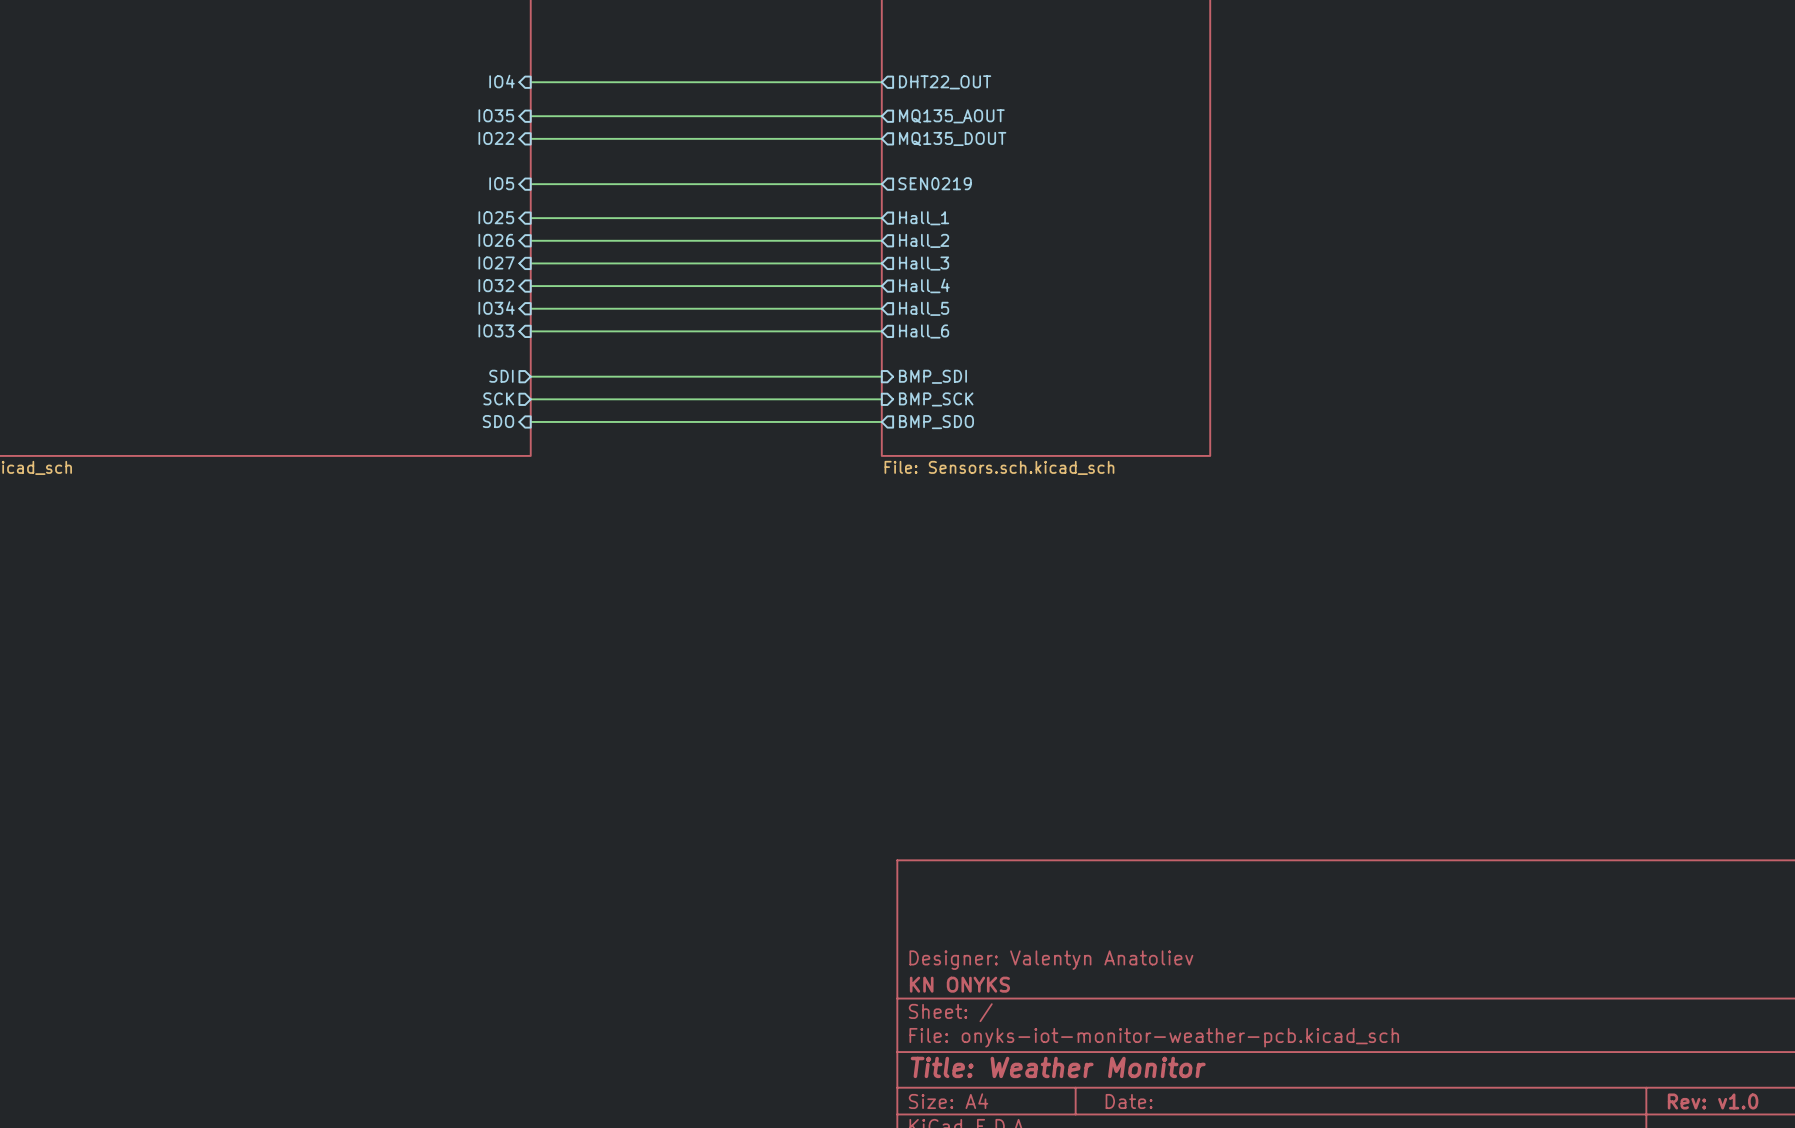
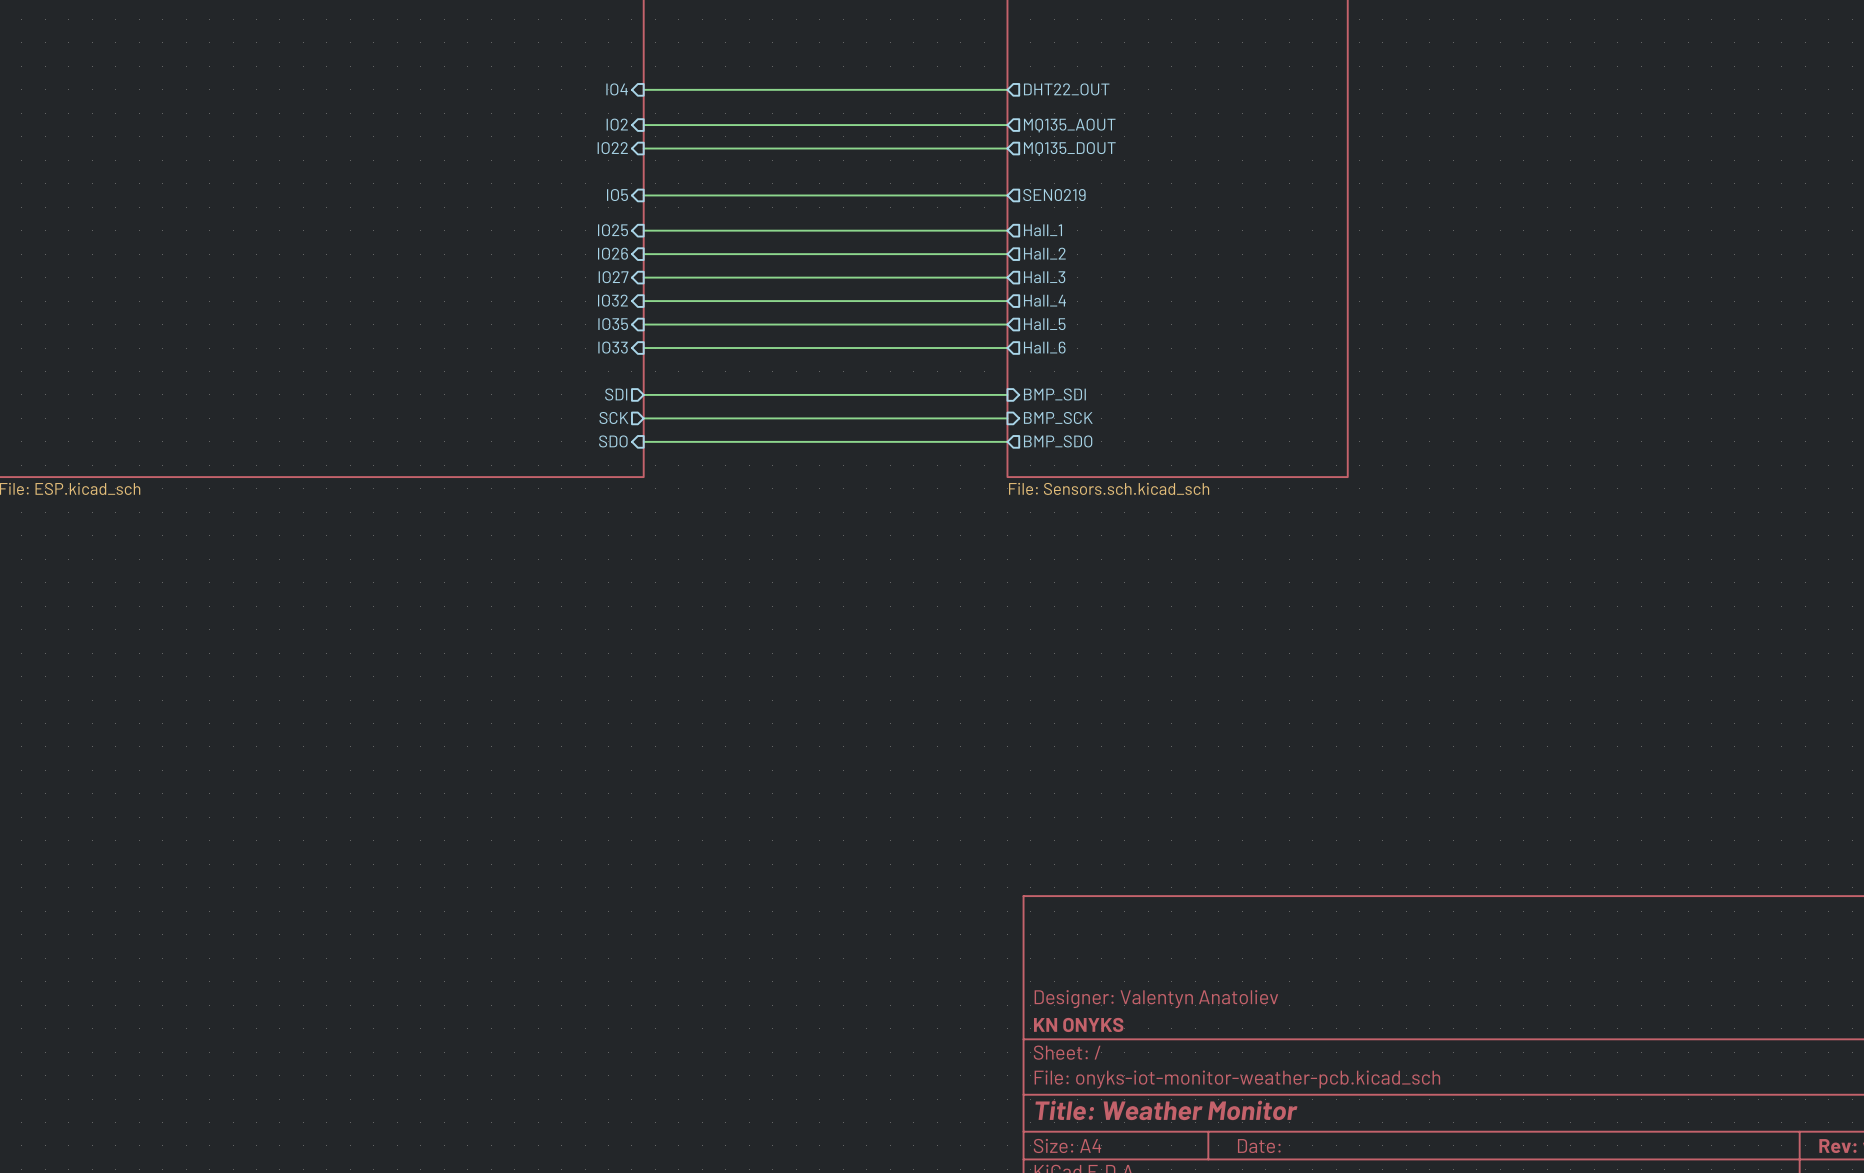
sheet pin: IO35 (496, 115) -> IO2 (617, 124)
sheet pin: IO34 (496, 308) -> IO35 (613, 324)

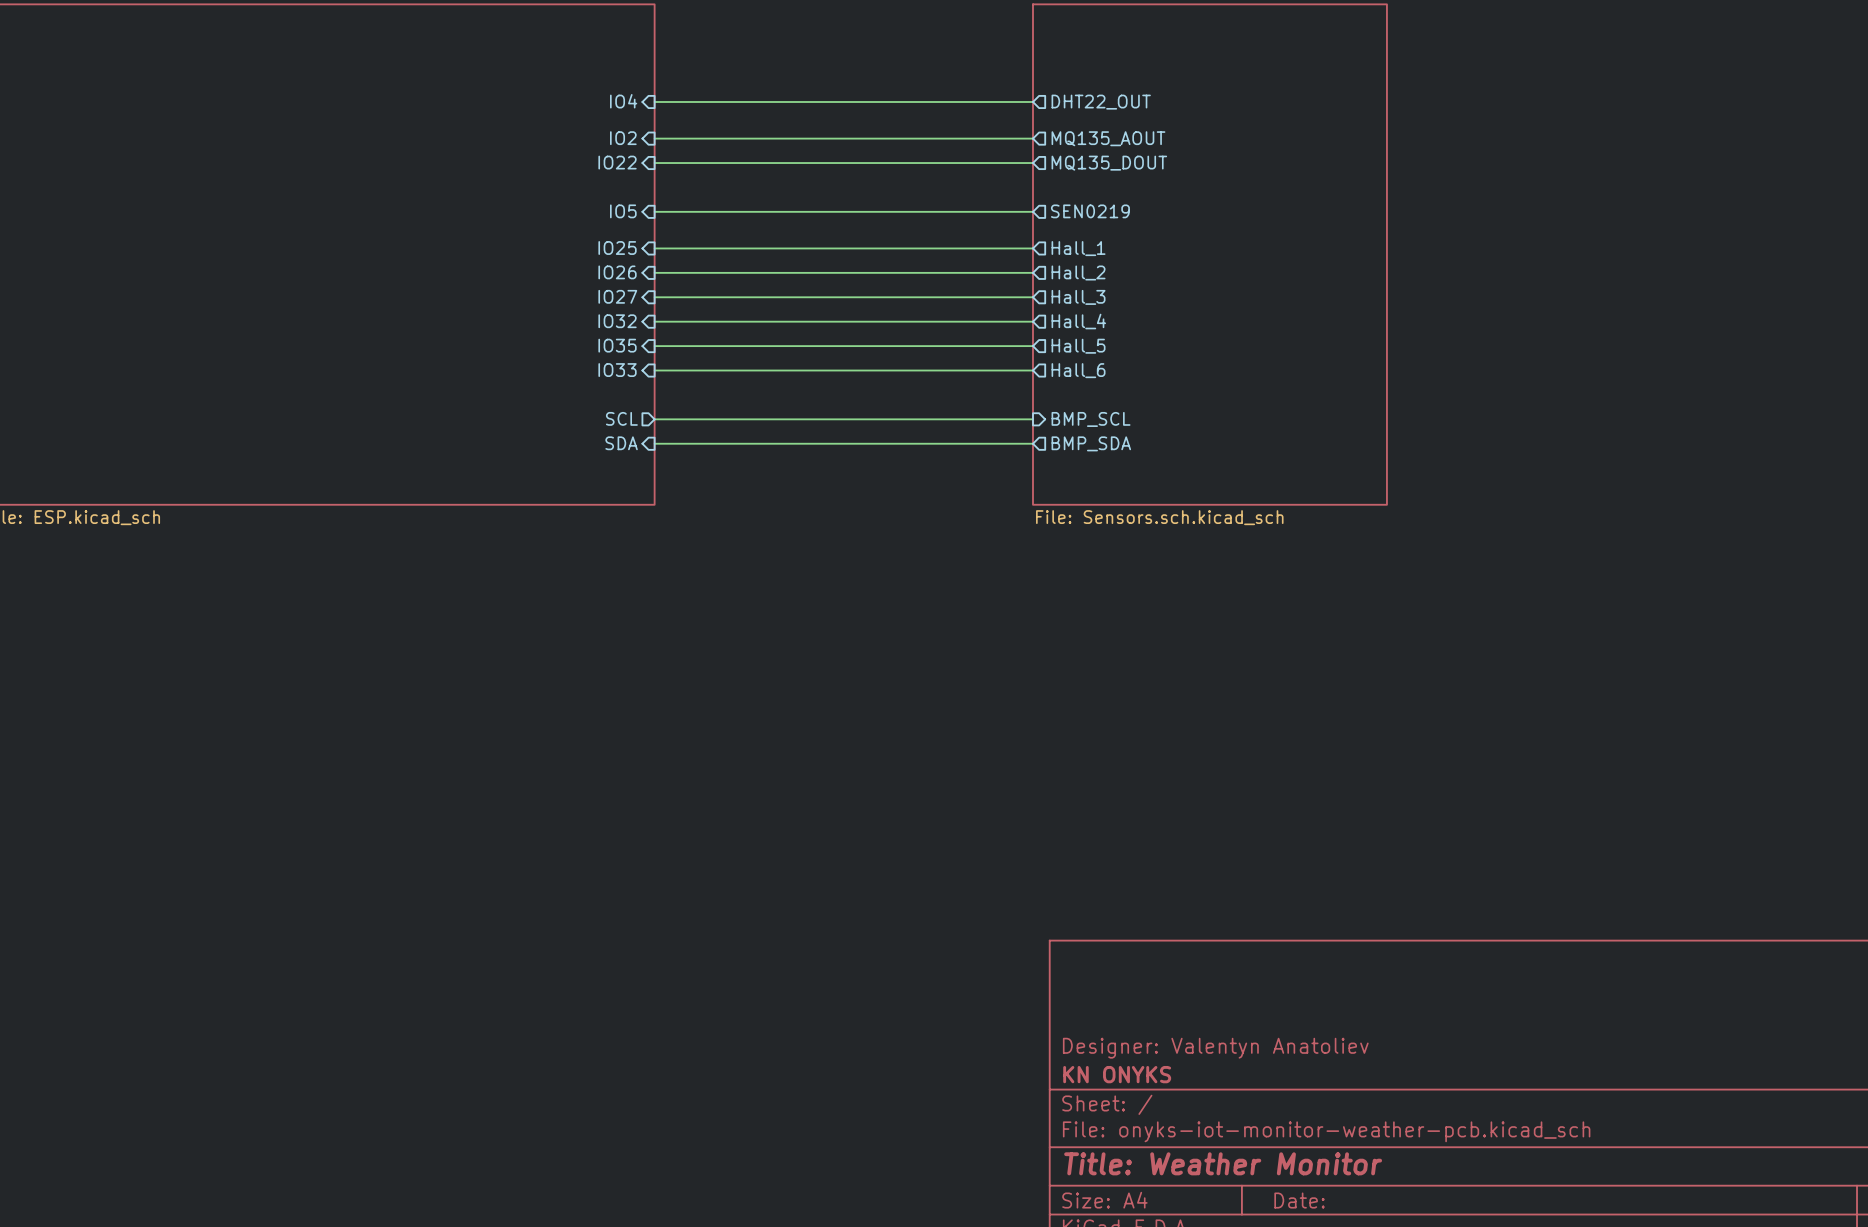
sheet pin: SDI (616, 394) -> SCL (621, 418)
sheet pin: BMP_SDI (1054, 394) -> BMP_SCL (1091, 419)
sheet pin shape: output (613, 417) -> input (621, 443)
sheet pin: SCK (613, 417) -> SDA (621, 443)
sheet pin shape: input (1058, 417) -> output (1091, 443)
sheet pin: BMP_SCK (1058, 417) -> BMP_SDA (1091, 443)
sheet pin: SDO (613, 441) -> none
wire: (643, 441) (1007, 441) -> none
sheet pin: BMP_SDO (1058, 441) -> none

